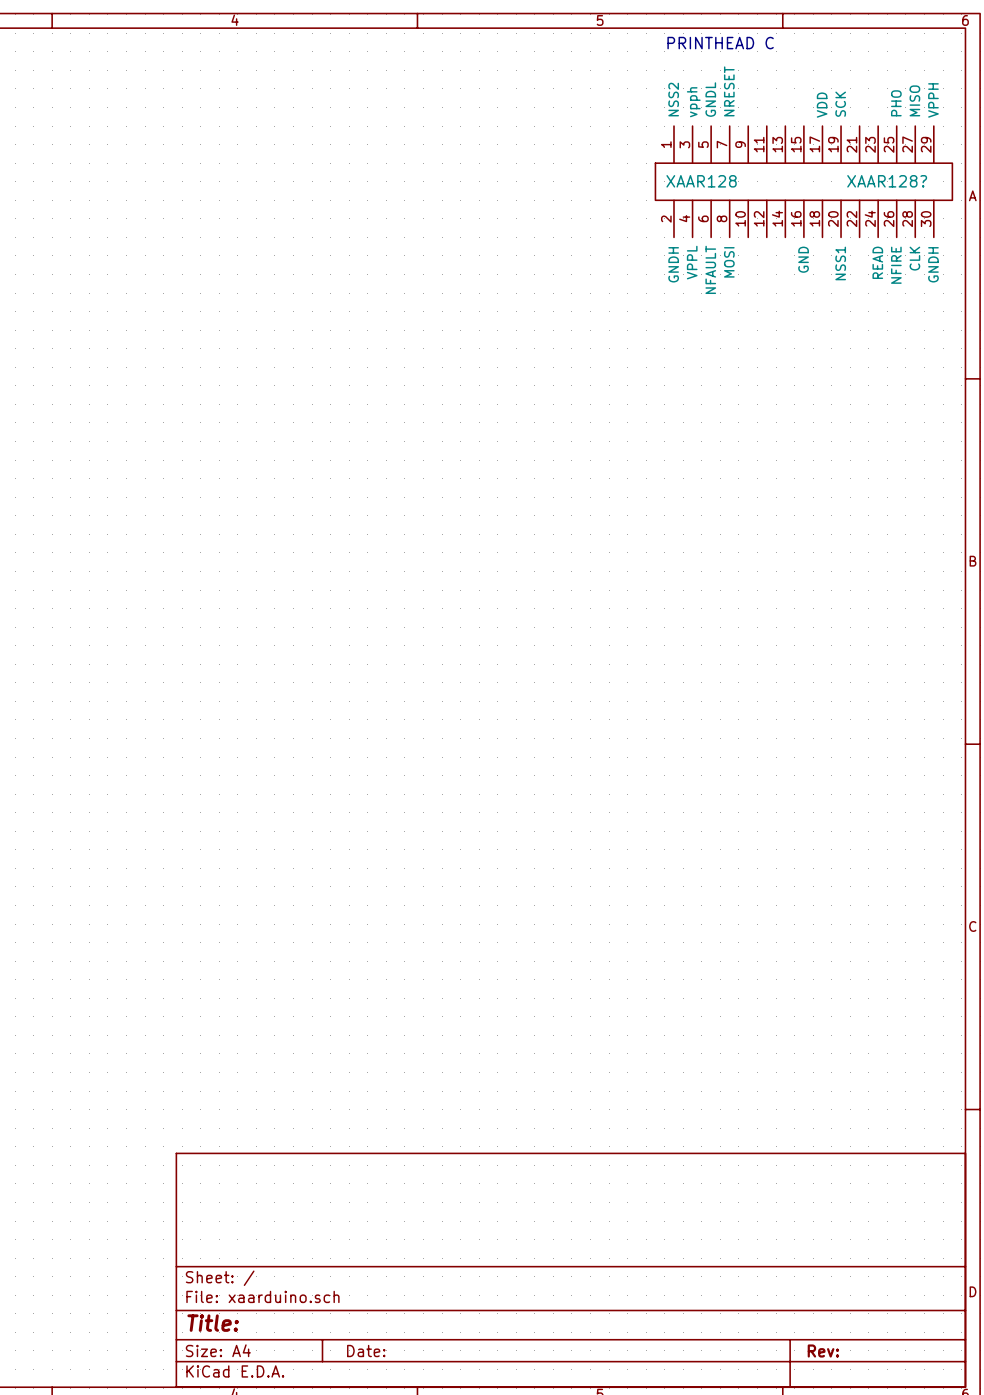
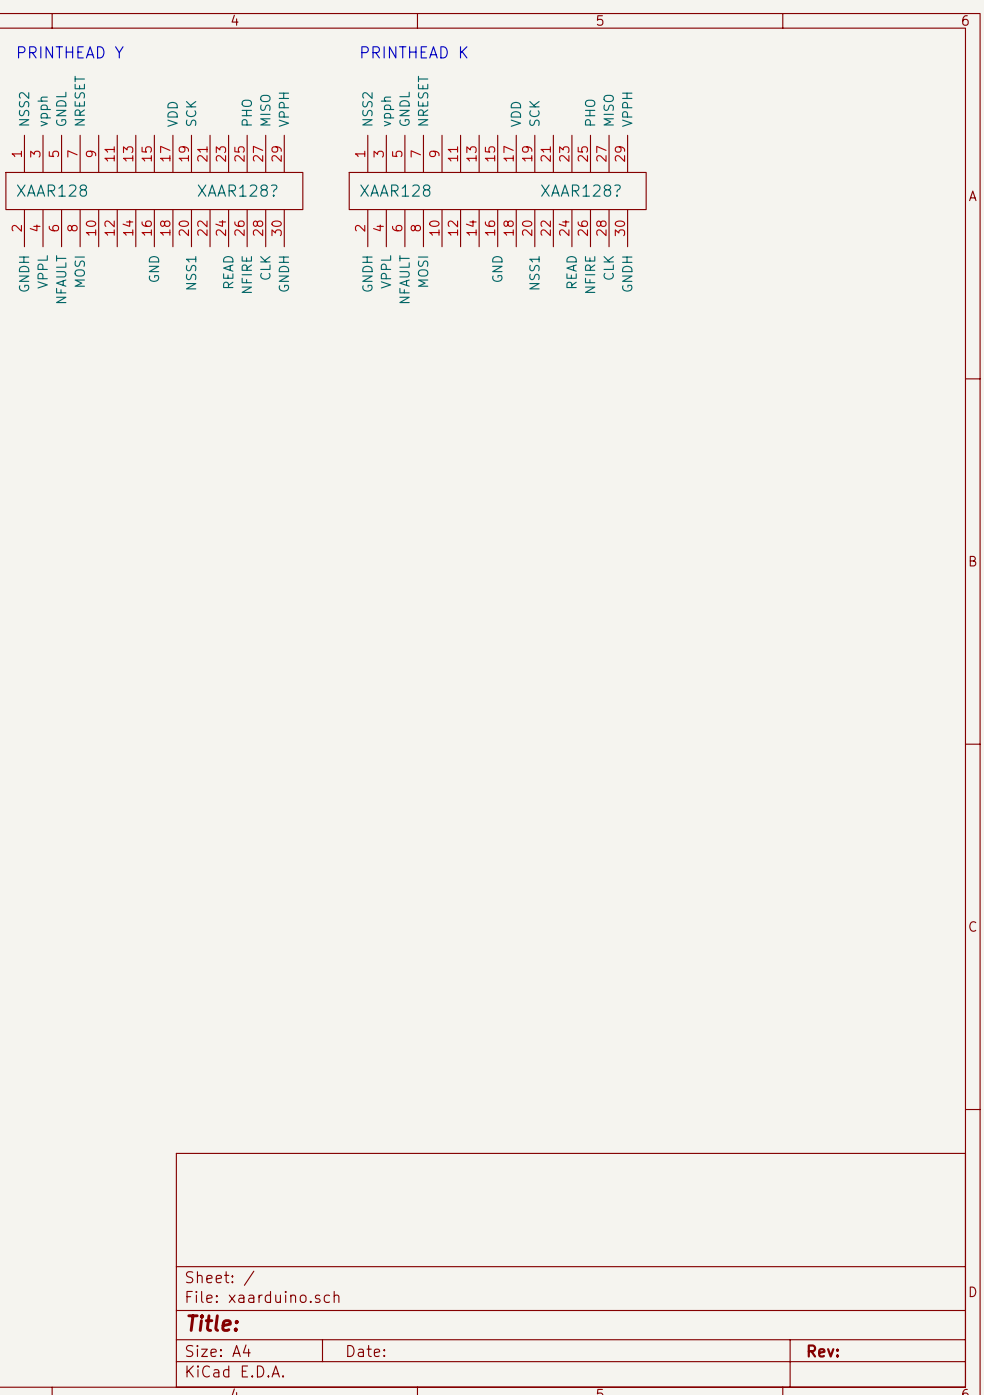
text: PRINTHEAD C (720, 43) -> none
text: none -> PRINTHEAD Y (70, 52)
text: none -> PRINTHEAD K (414, 52)
XAAR128?: XAAR128 (803, 181) -> none
XAAR128?: none -> XAAR128 (154, 191)
XAAR128?: none -> XAAR128 (497, 191)

